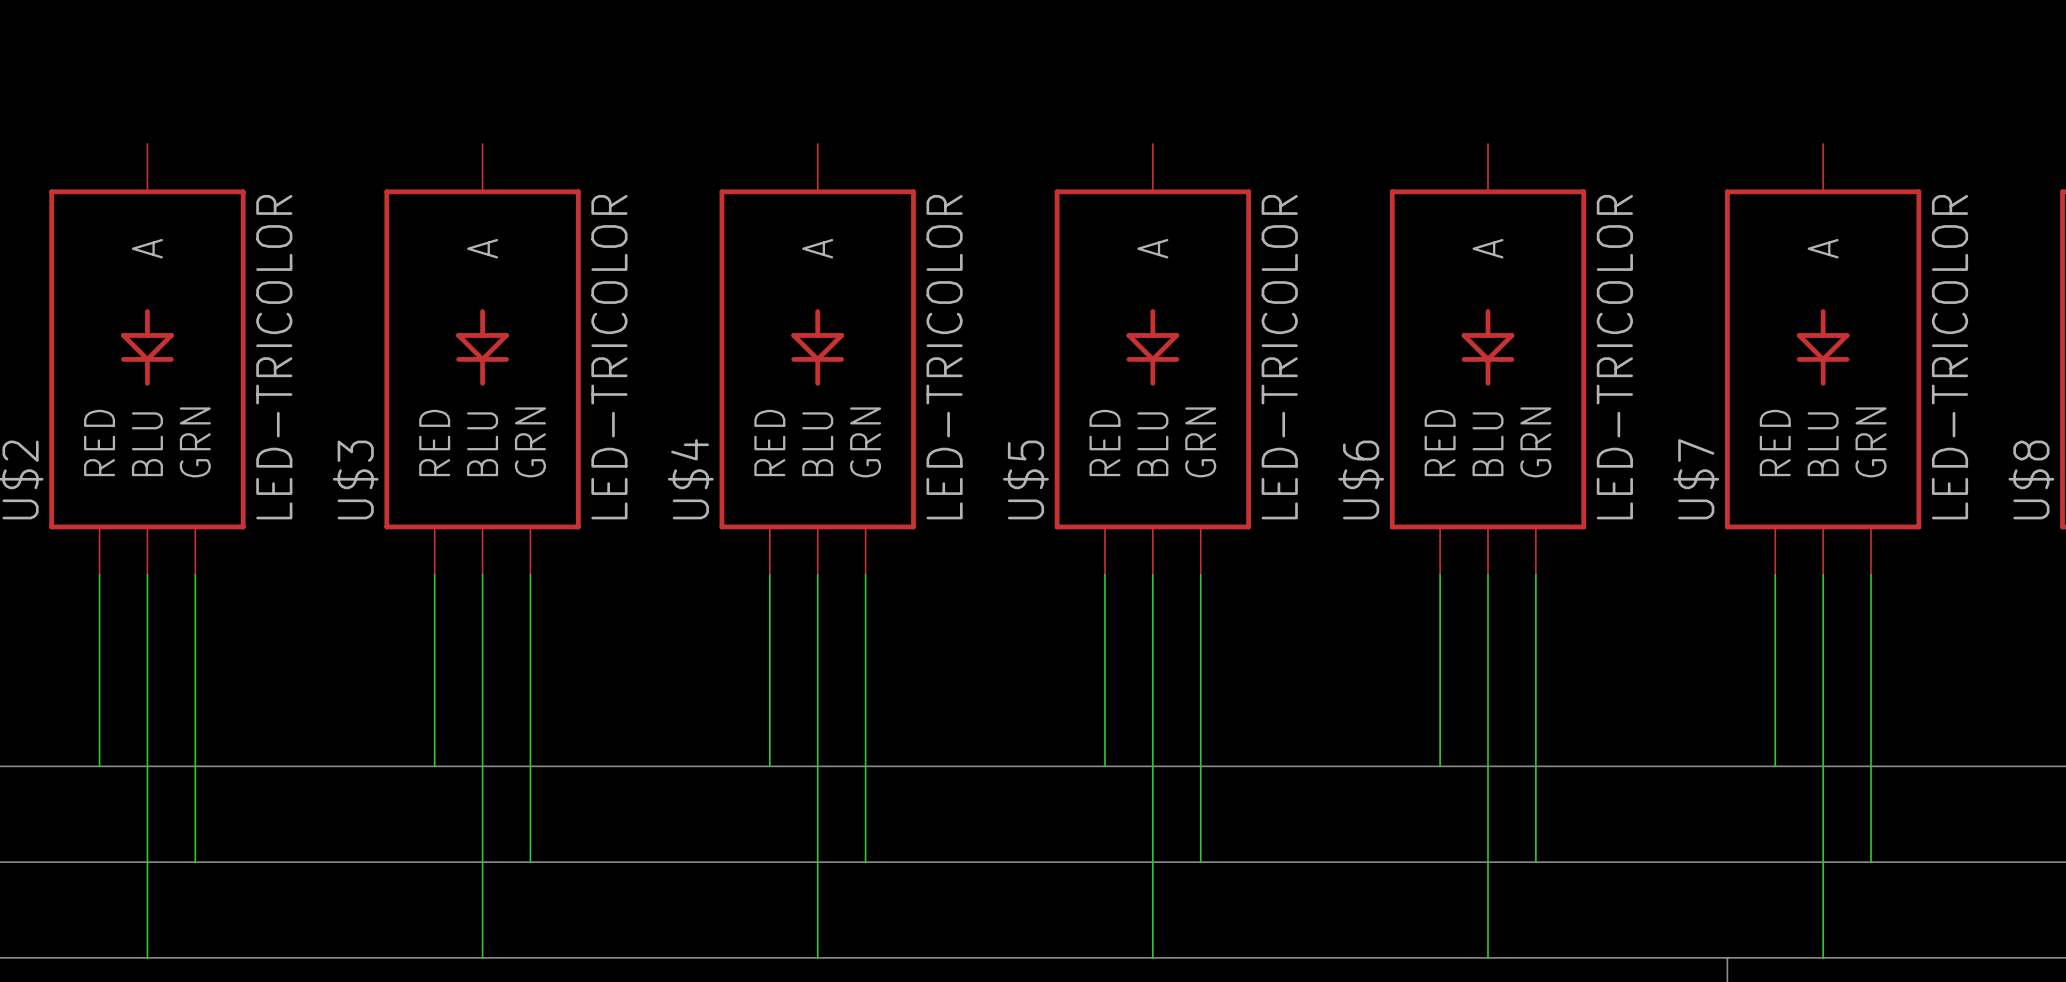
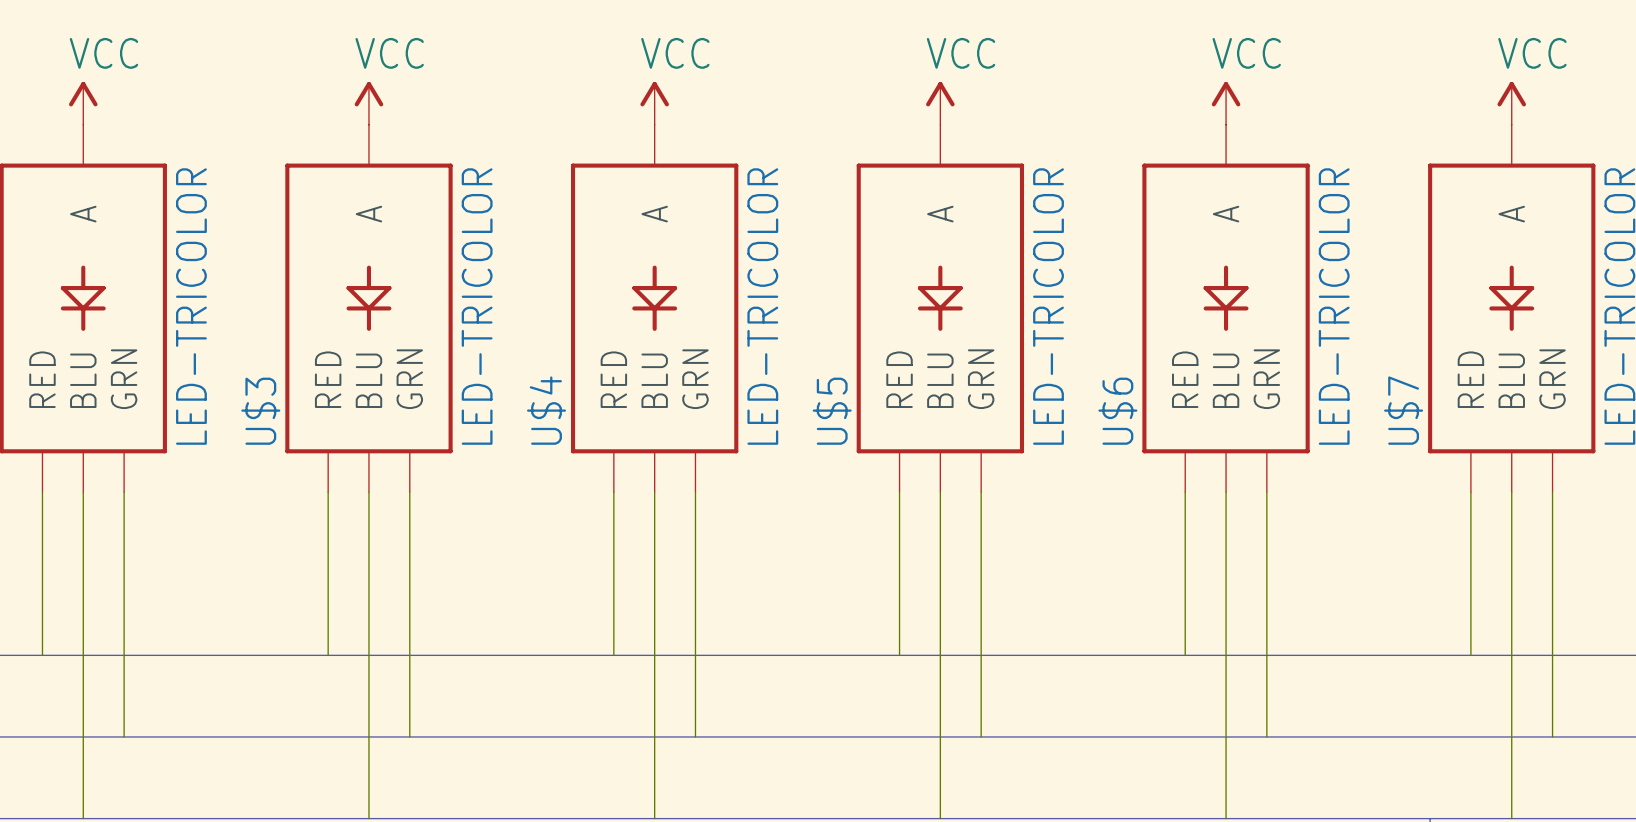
power symbol: none -> VCC (83, 103)
power symbol: none -> VCC (368, 103)
power symbol: none -> VCC (654, 103)
power symbol: none -> VCC (940, 103)
power symbol: none -> VCC (1226, 103)
power symbol: none -> VCC (1511, 103)

